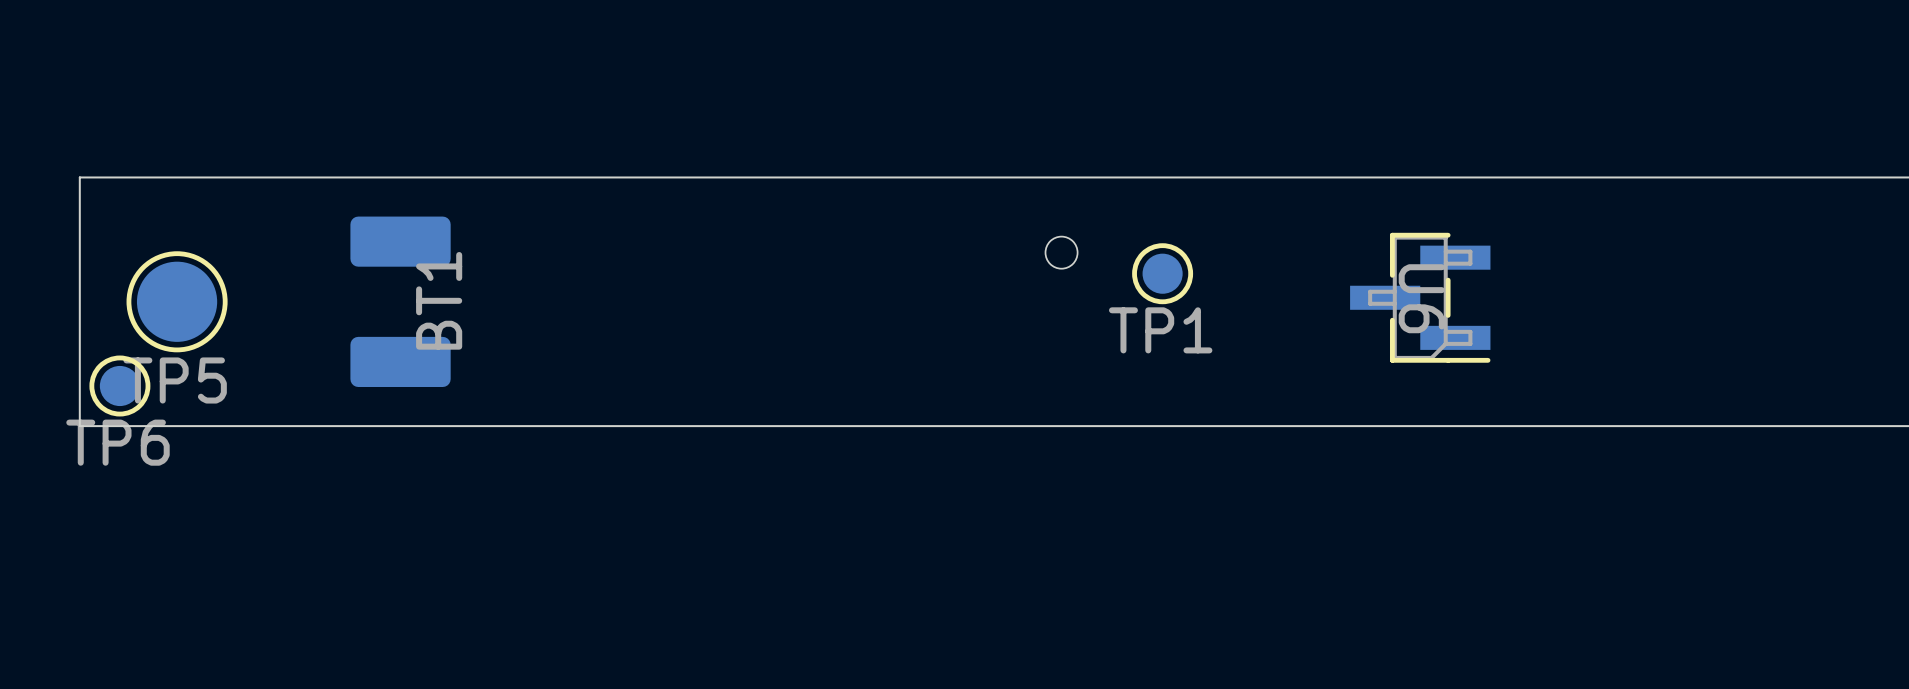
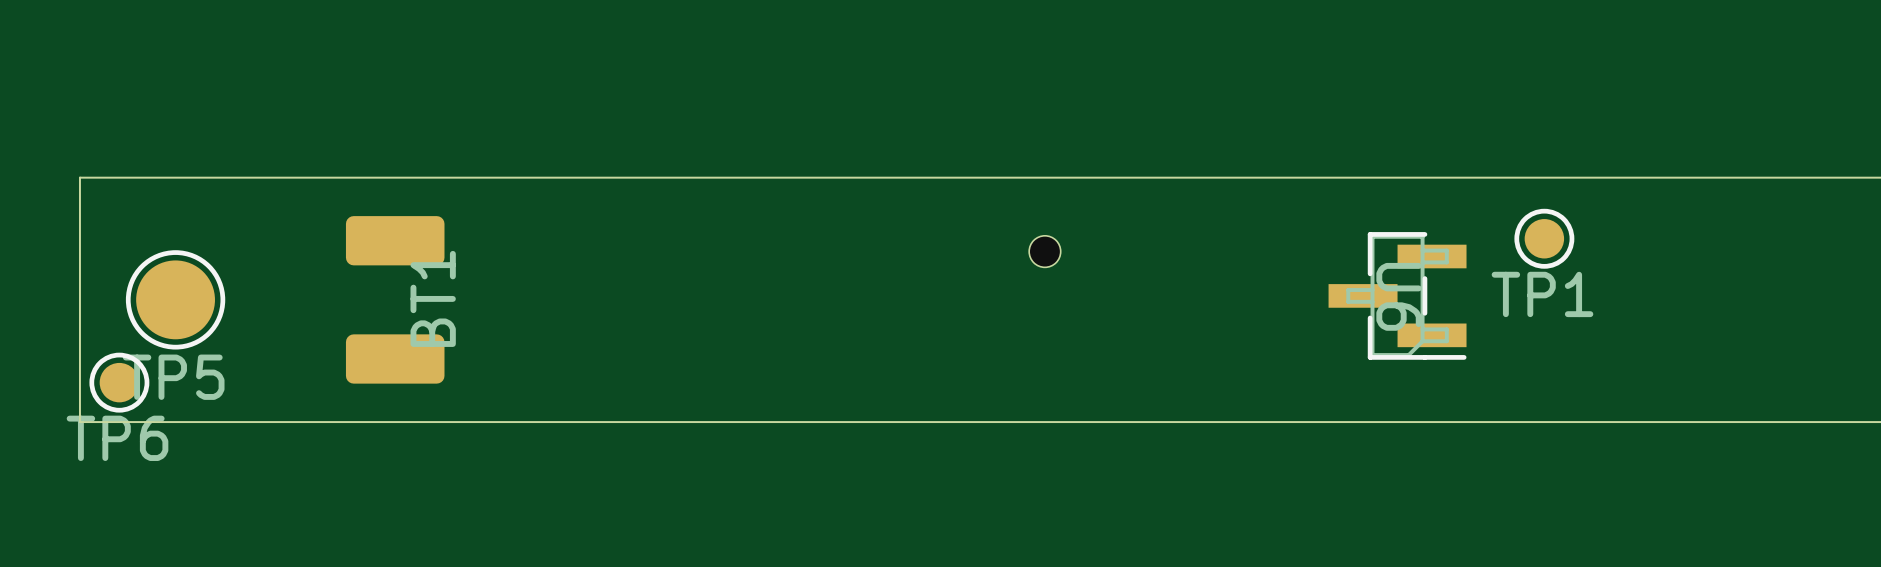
TP1 position: (1162, 273) -> (1544, 238)

